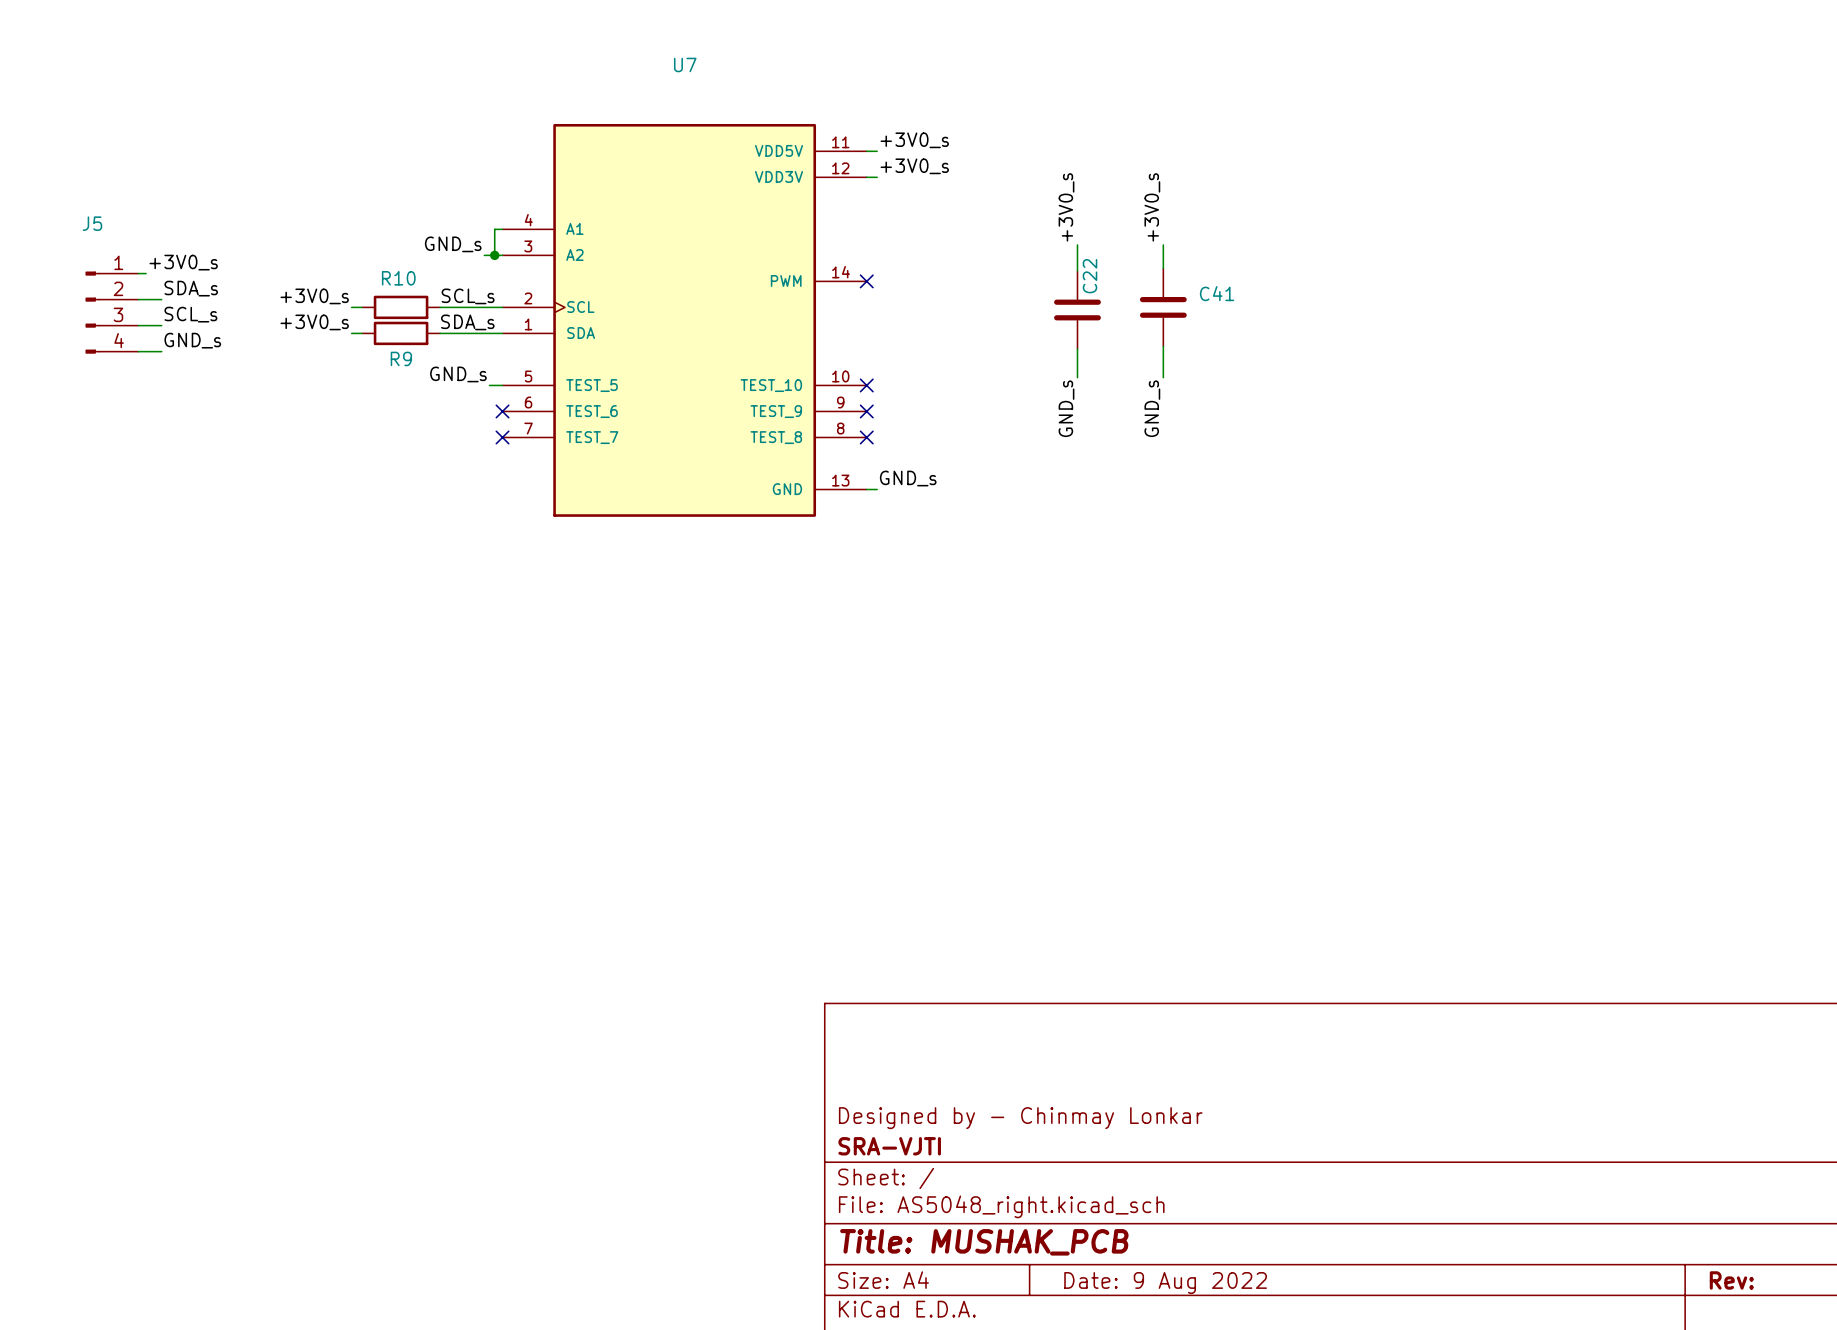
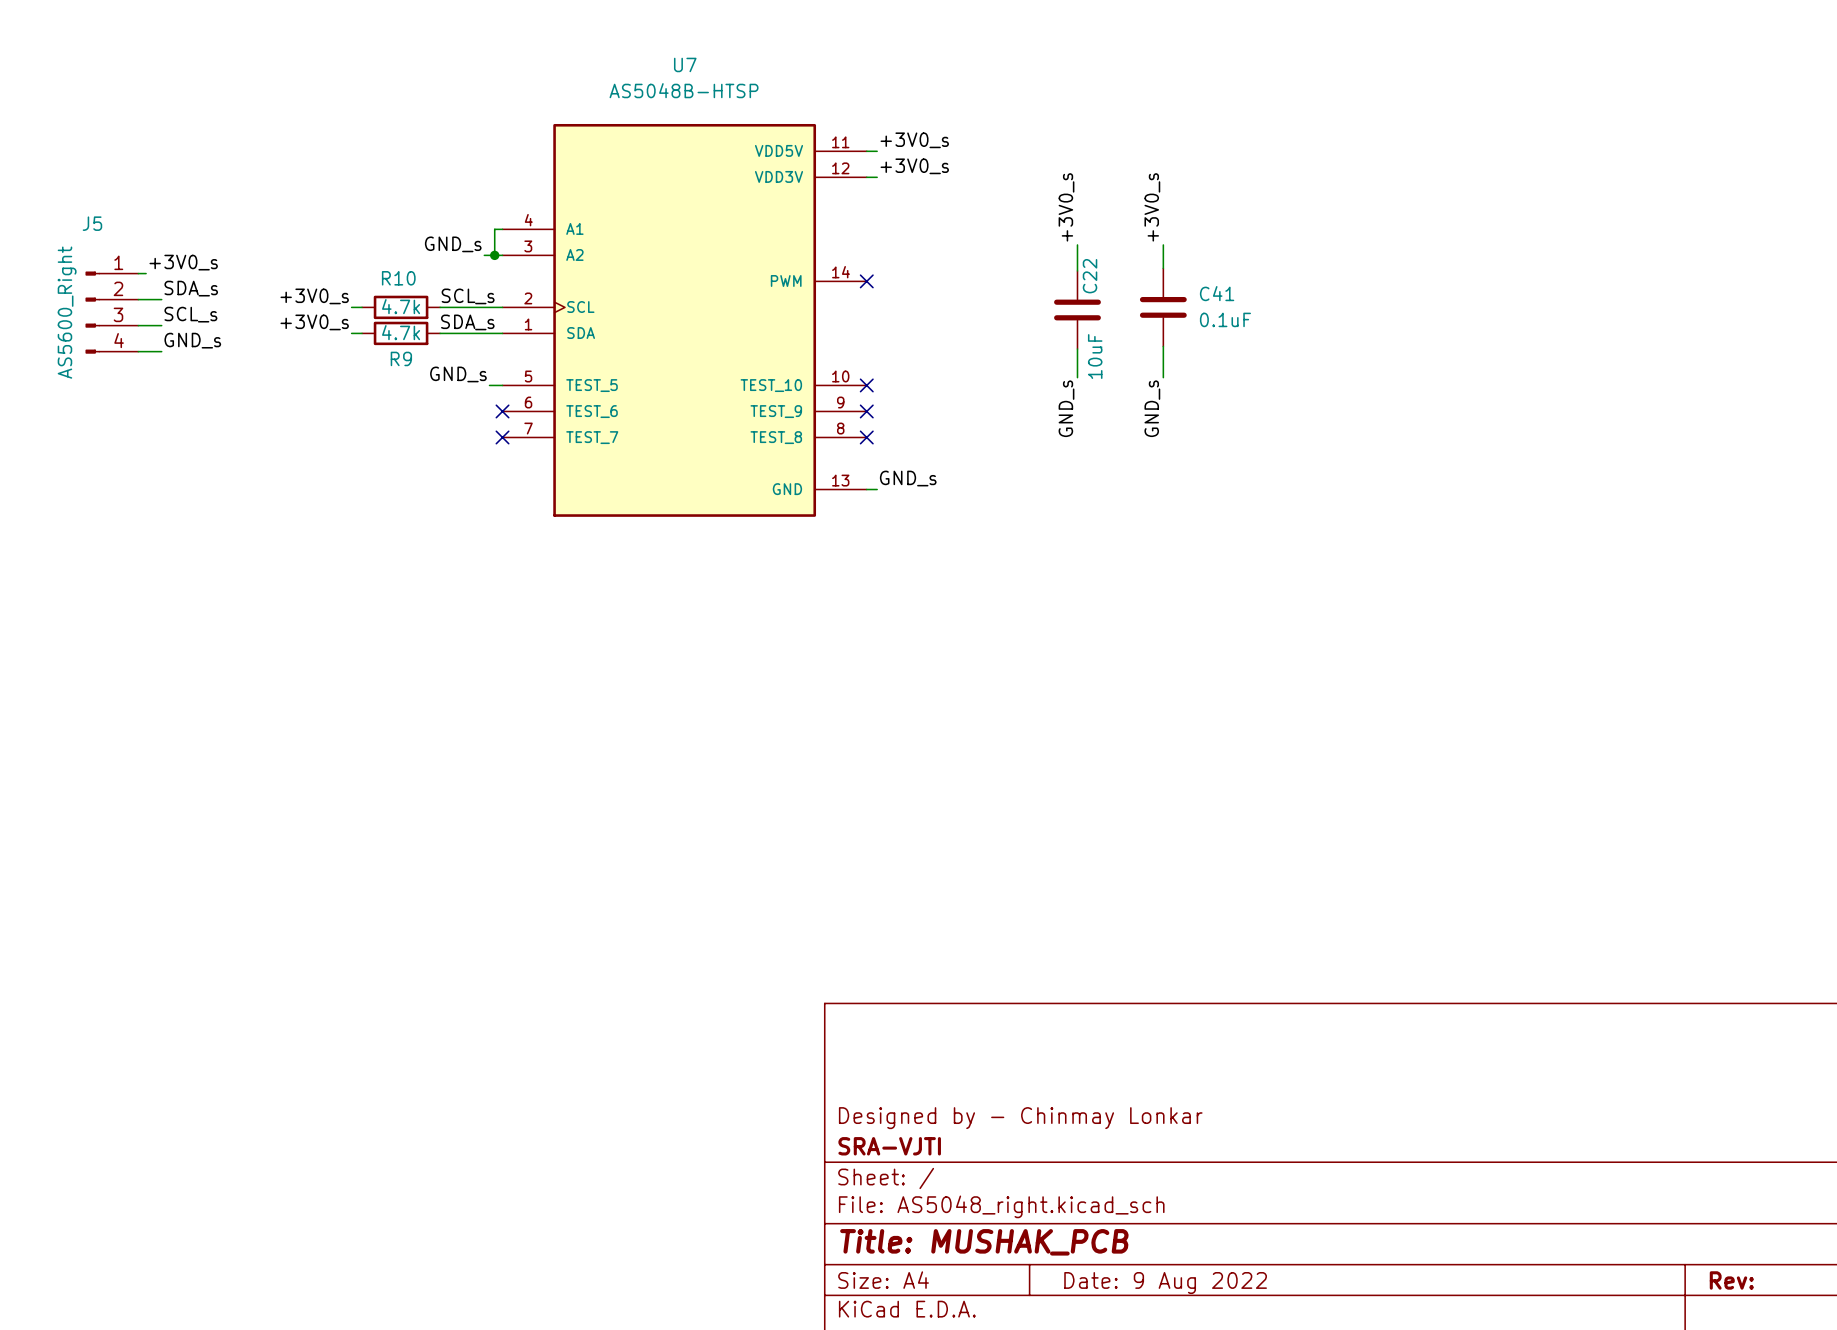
U7 value: none -> AS5048B-HTSP (684, 90)
R10 value: none -> 4.7k (401, 306)
J5 value: none -> AS5600_Right (67, 312)
C41 value: none -> 0.1uF (1225, 319)
R9 value: none -> 4.7k (401, 332)
C22 value: none -> 10uF (1095, 356)

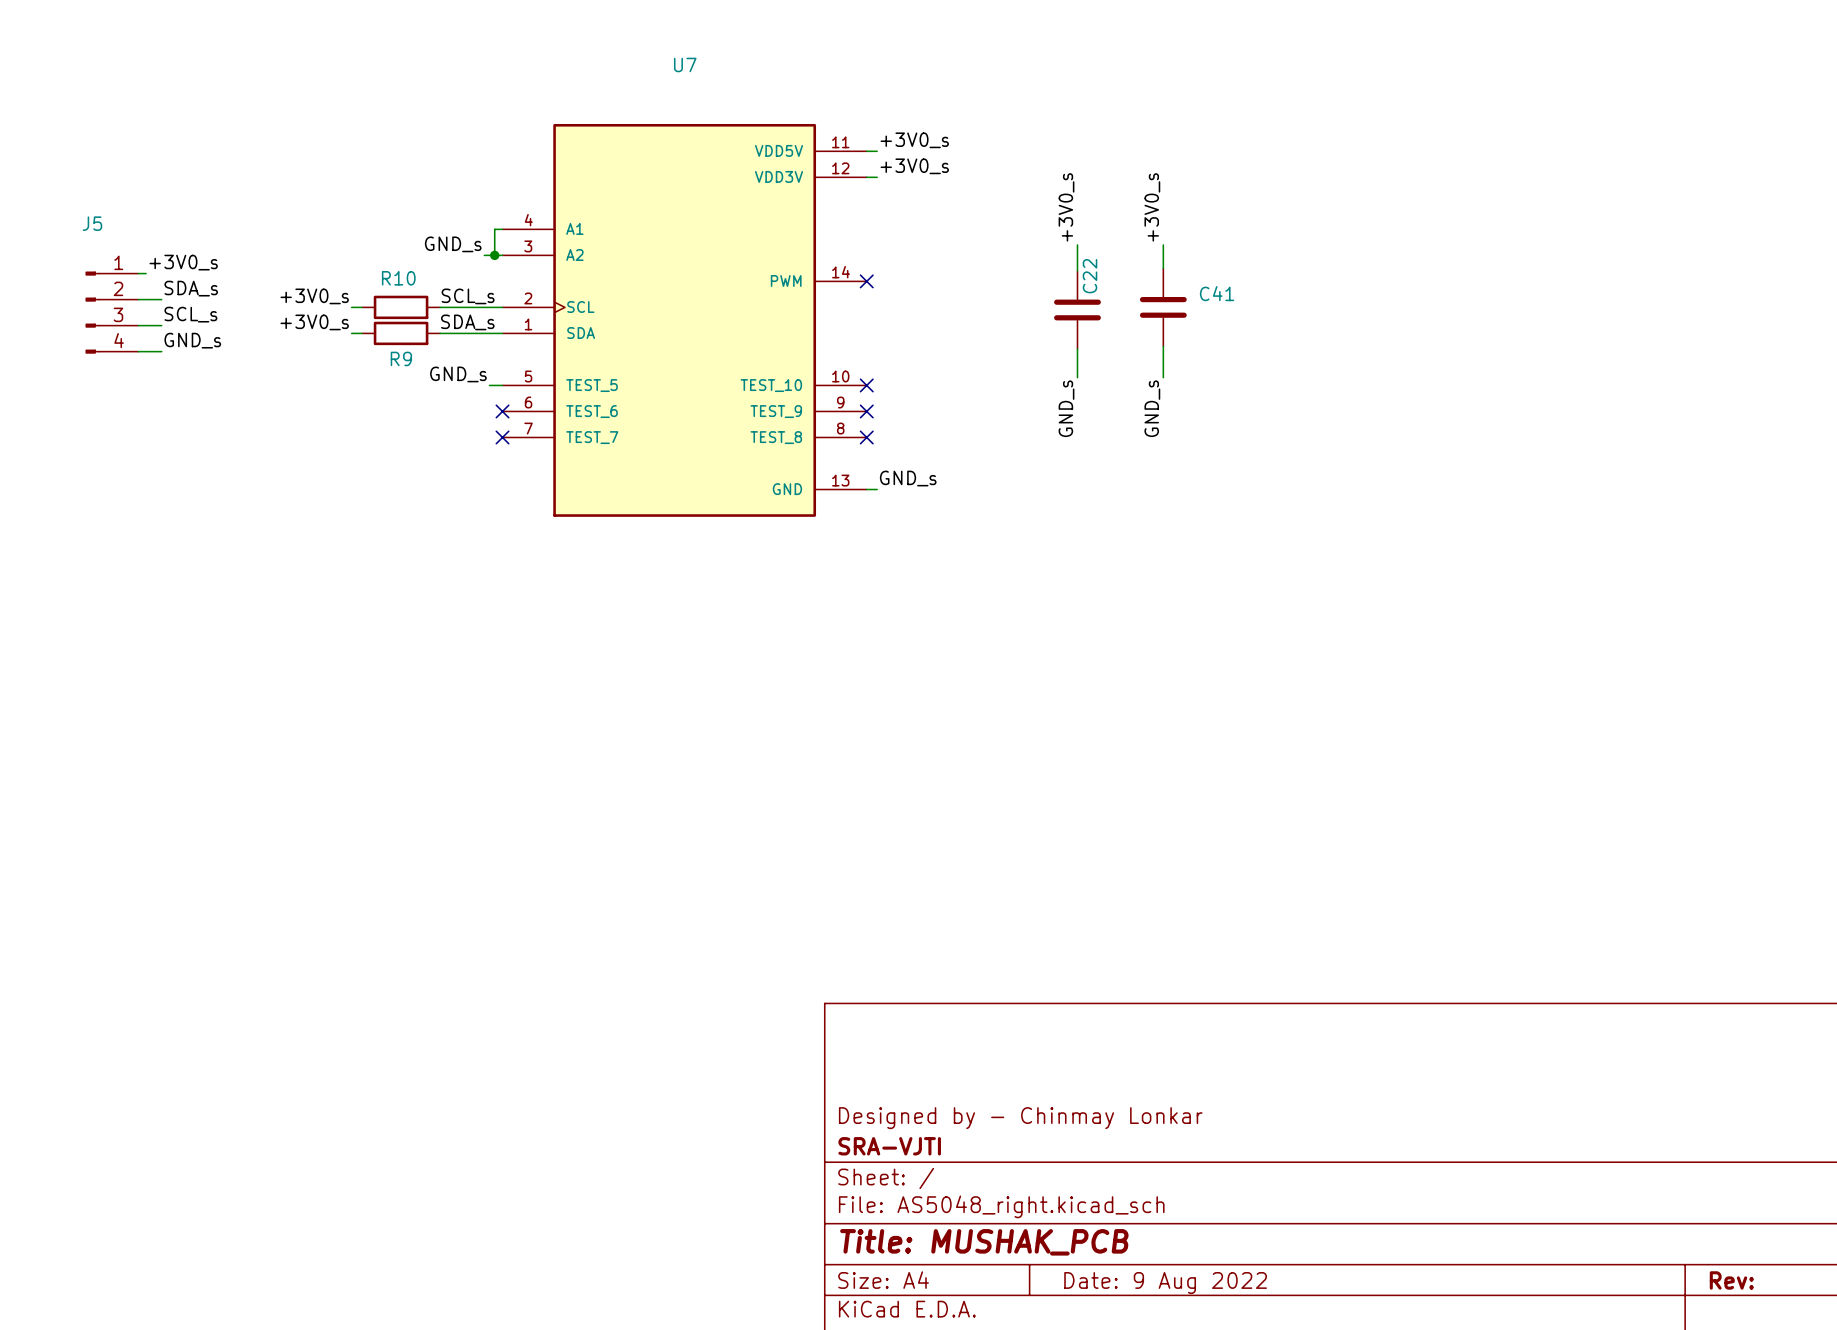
U7 value: AS5048B-HTSP (684, 90) -> none
R10 value: 4.7k (401, 306) -> none
J5 value: AS5600_Right (67, 312) -> none
C41 value: 0.1uF (1225, 319) -> none
R9 value: 4.7k (401, 332) -> none
C22 value: 10uF (1095, 356) -> none

